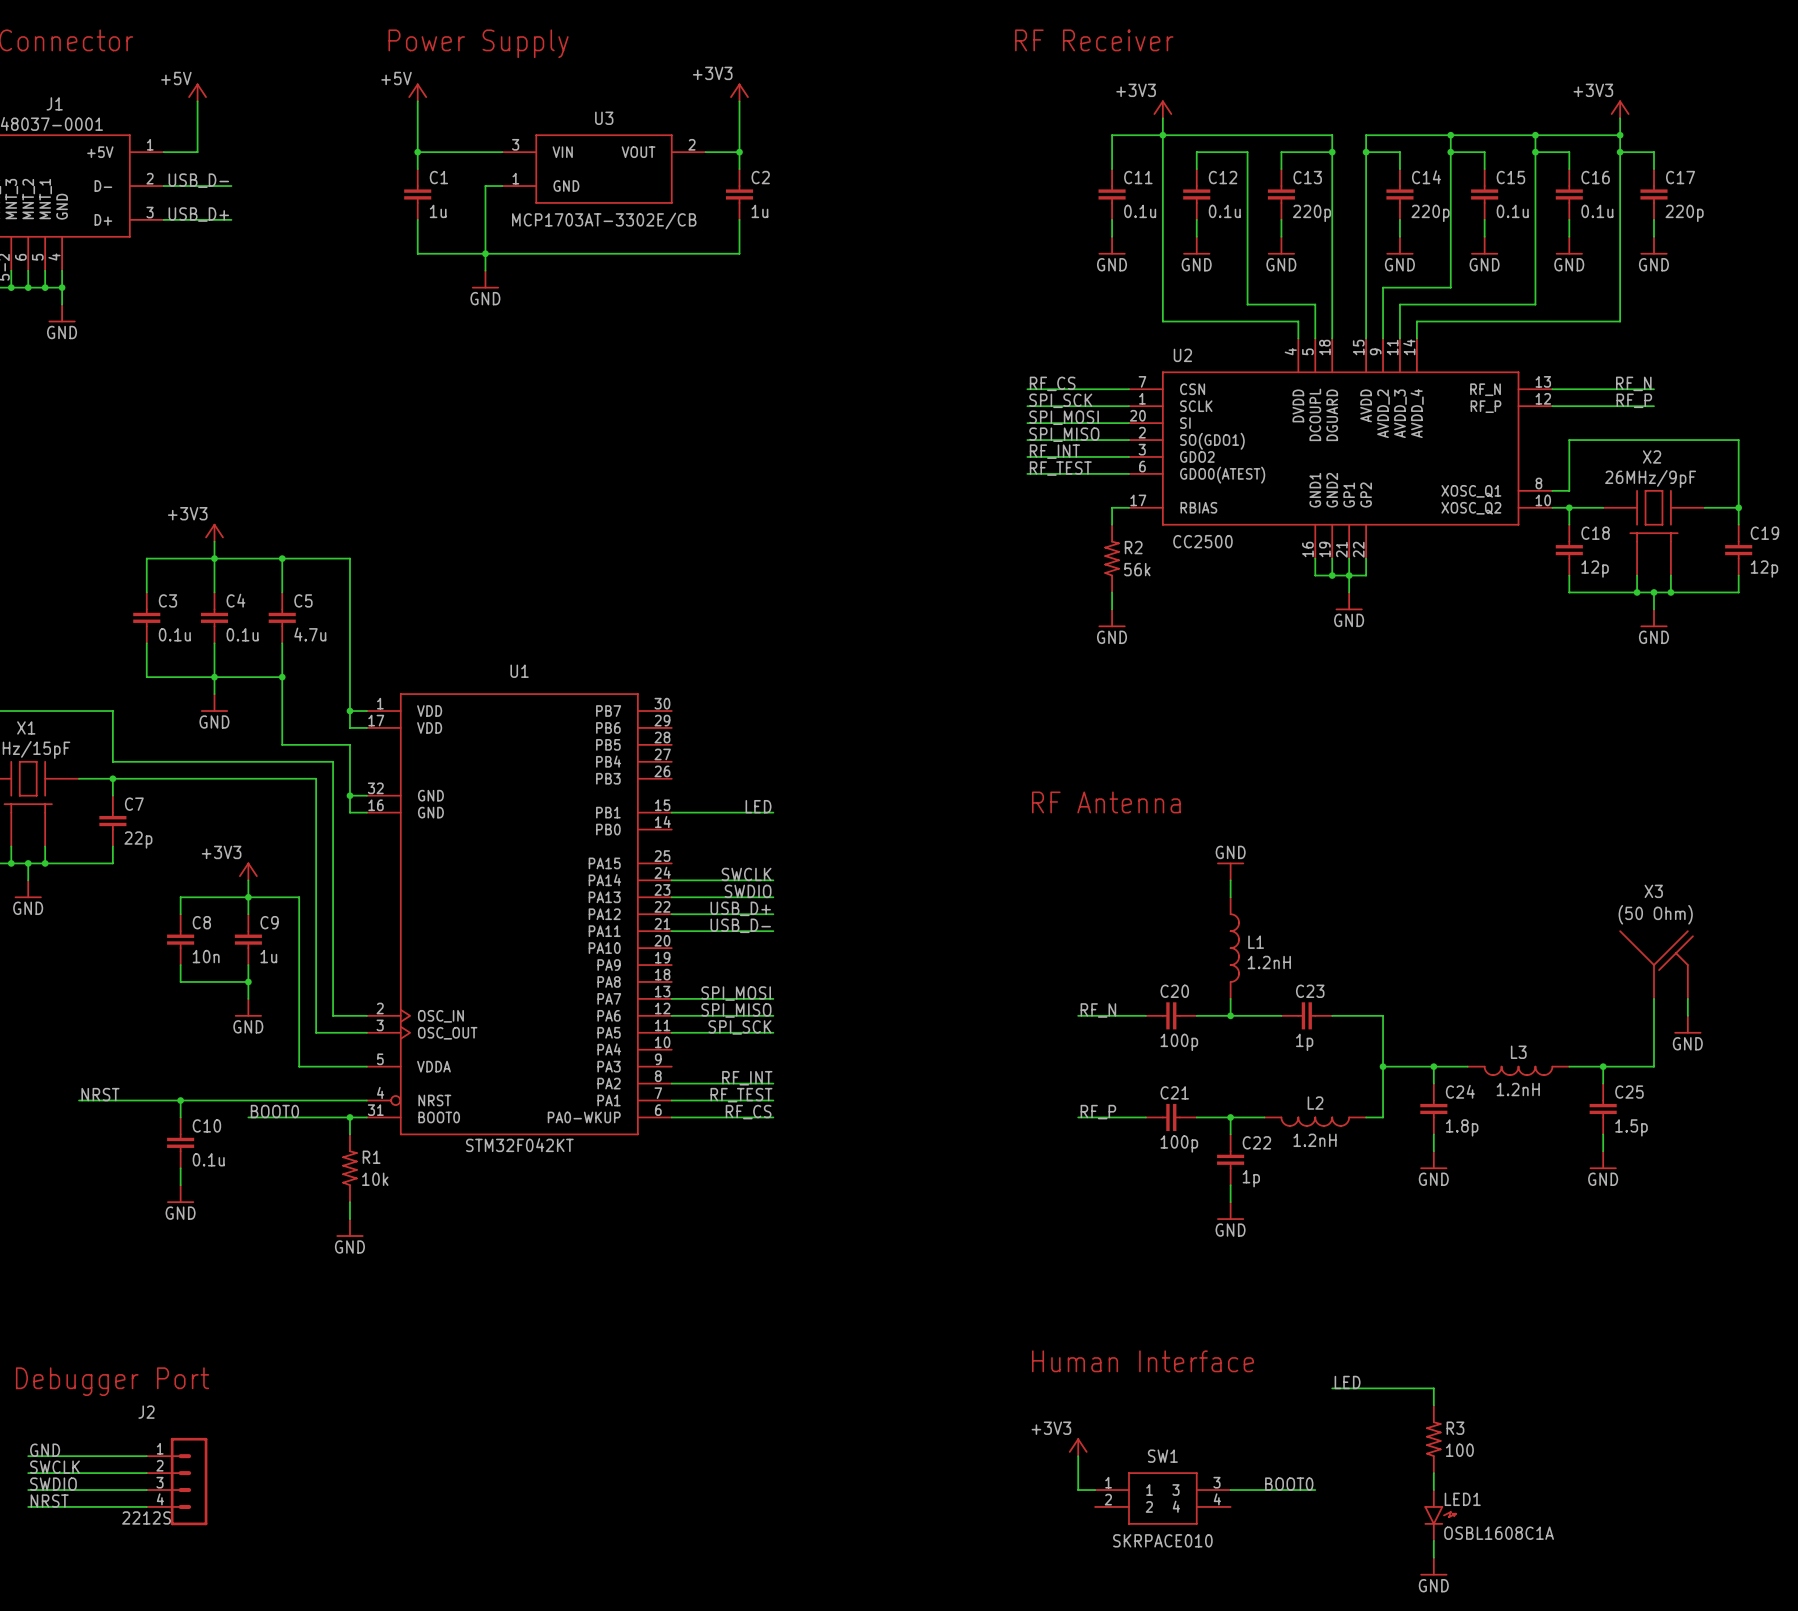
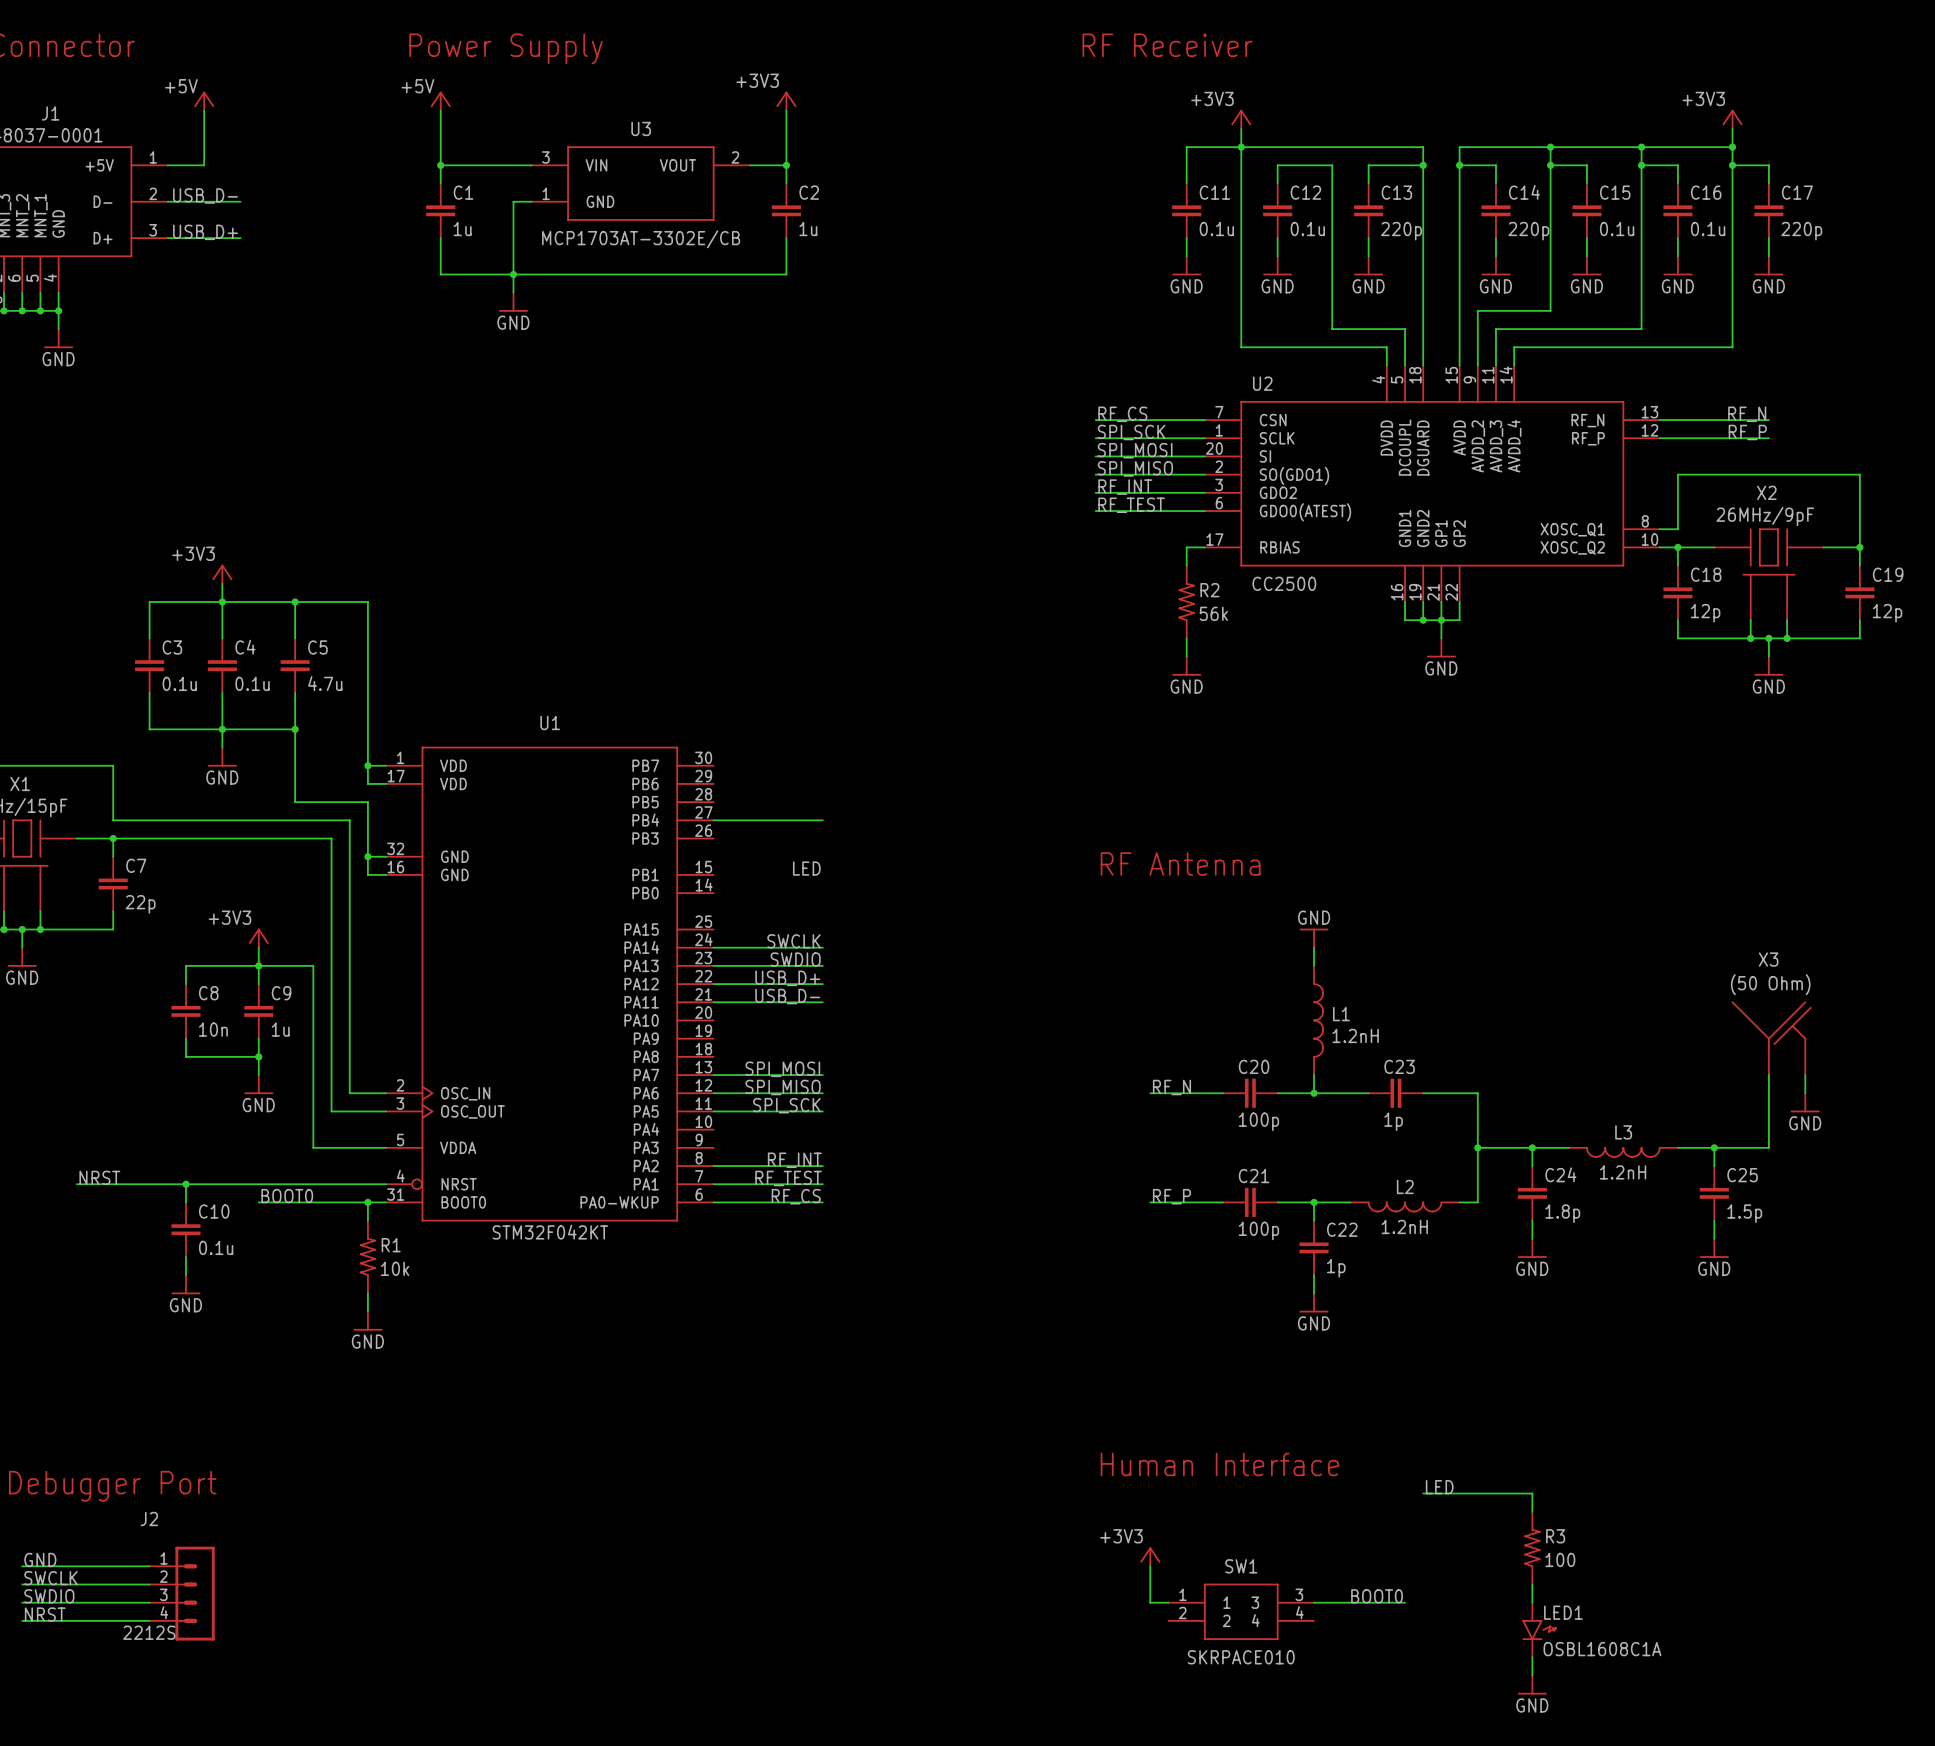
wire: (671, 812) (773, 812) -> (713, 820) (822, 820)

